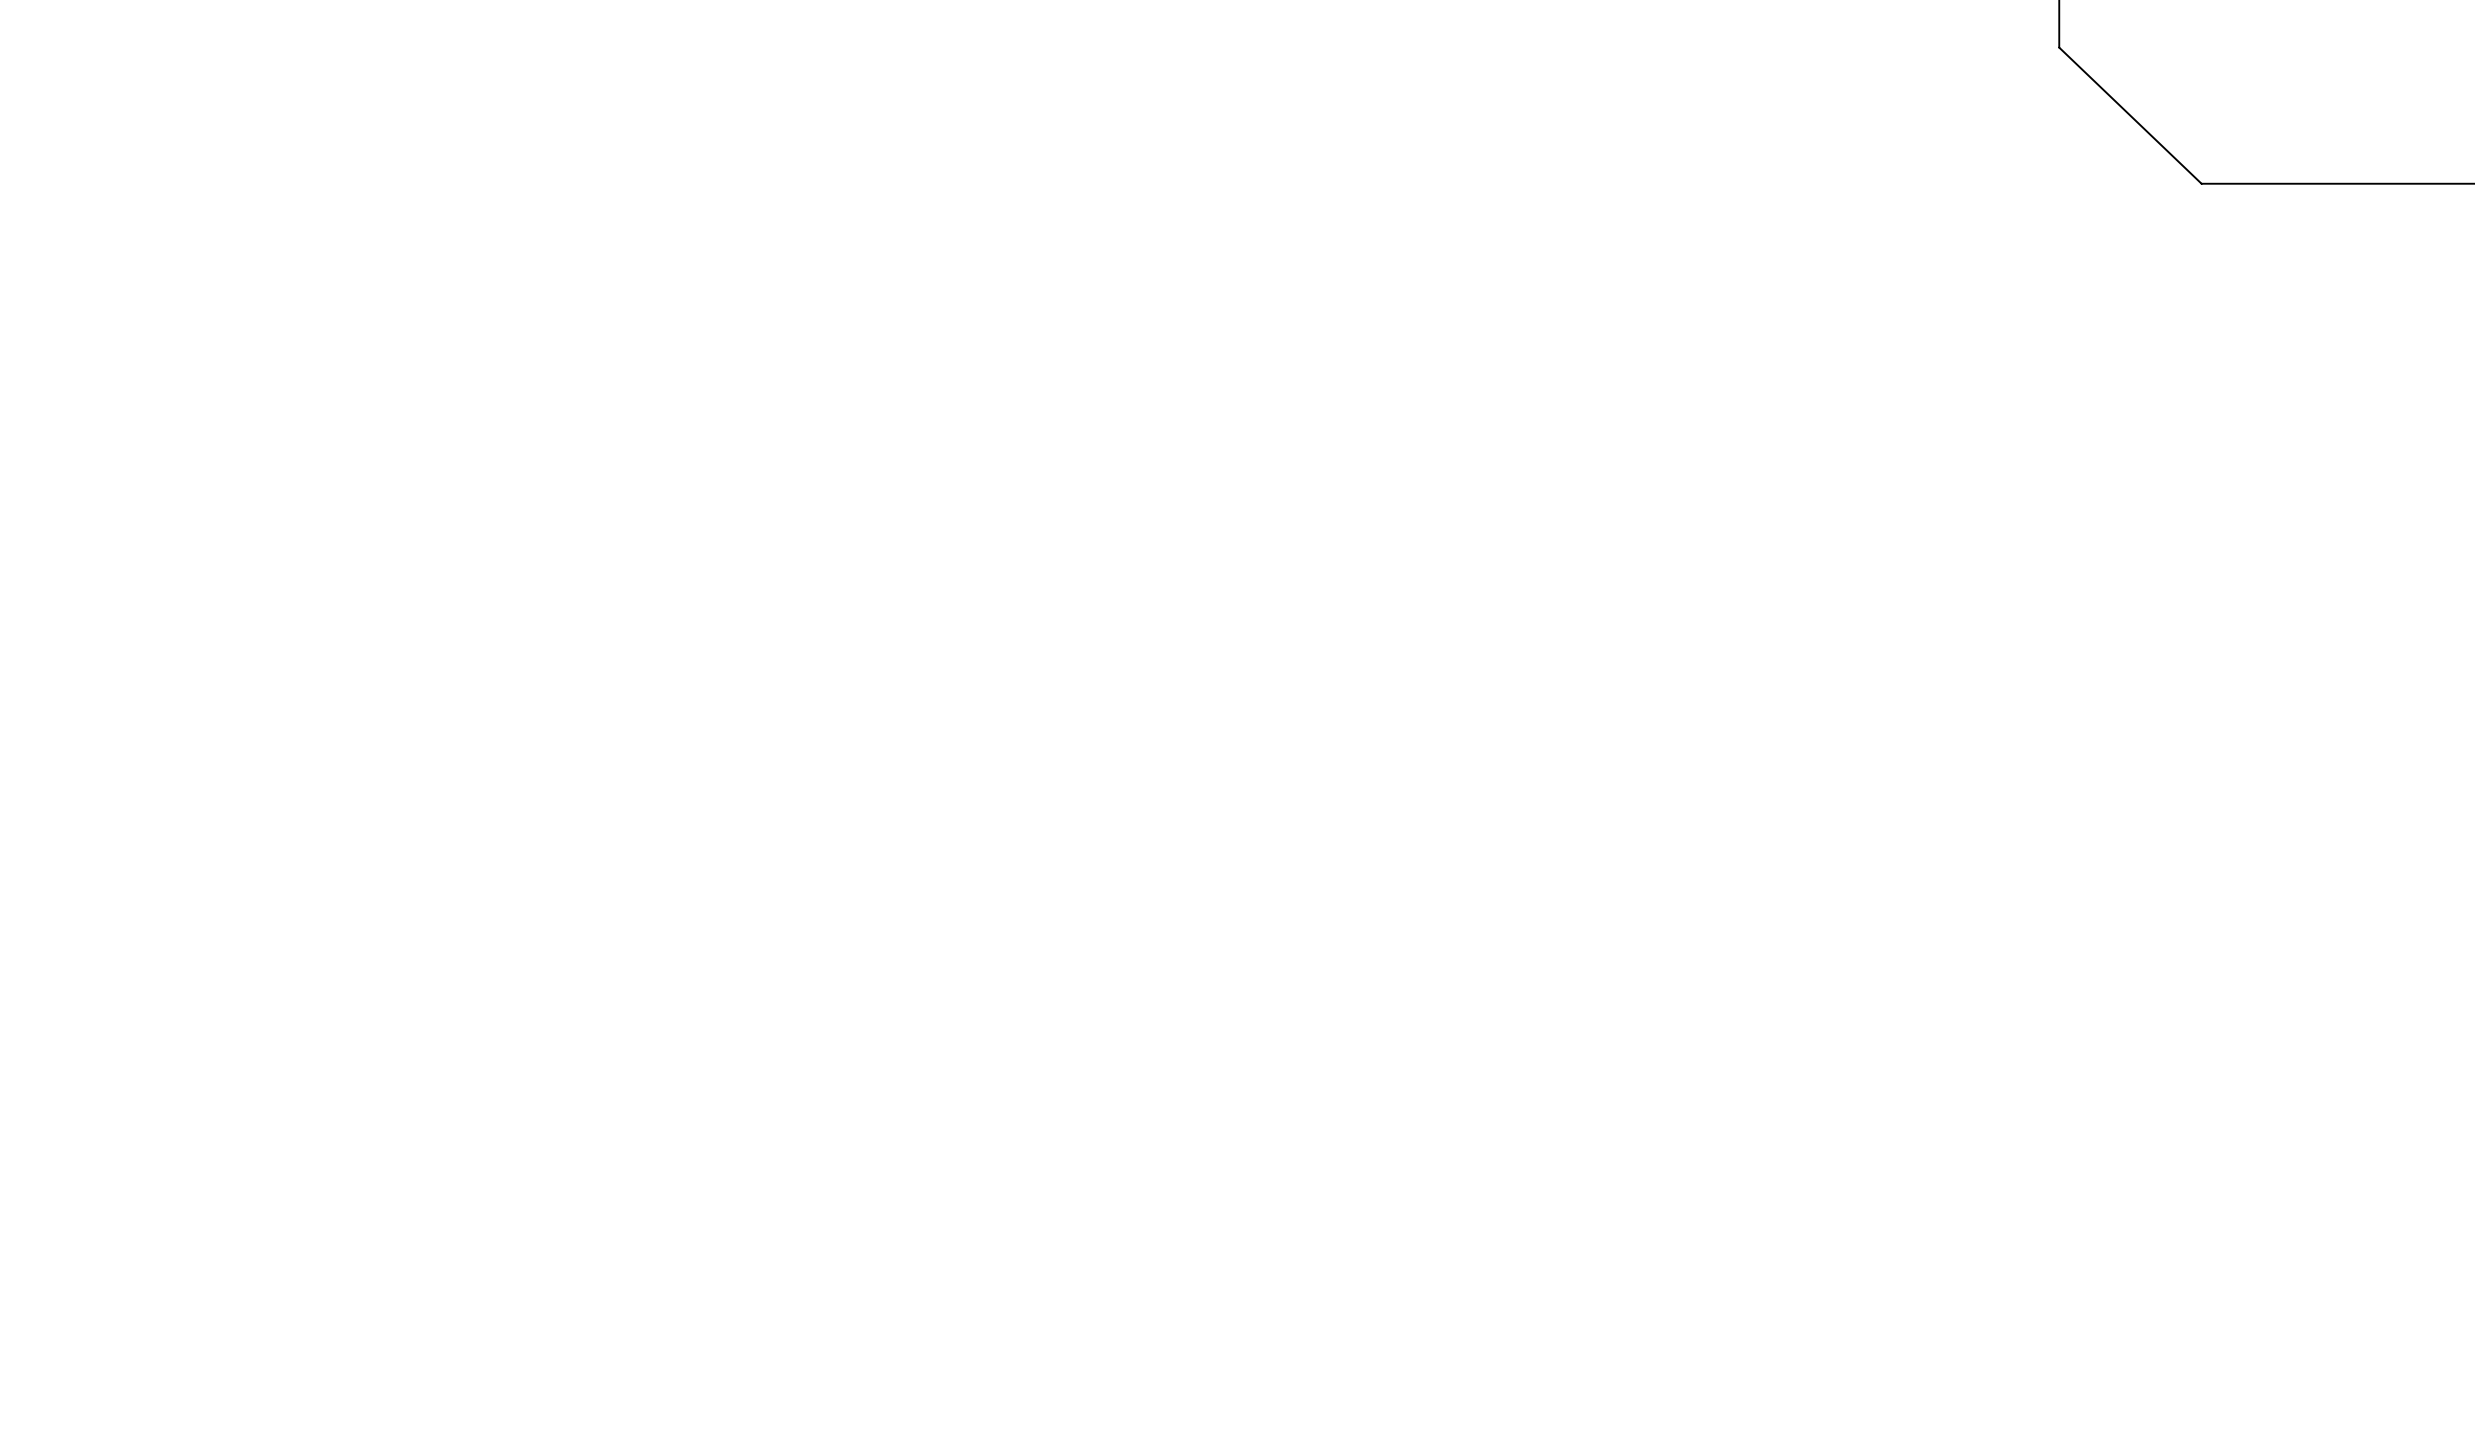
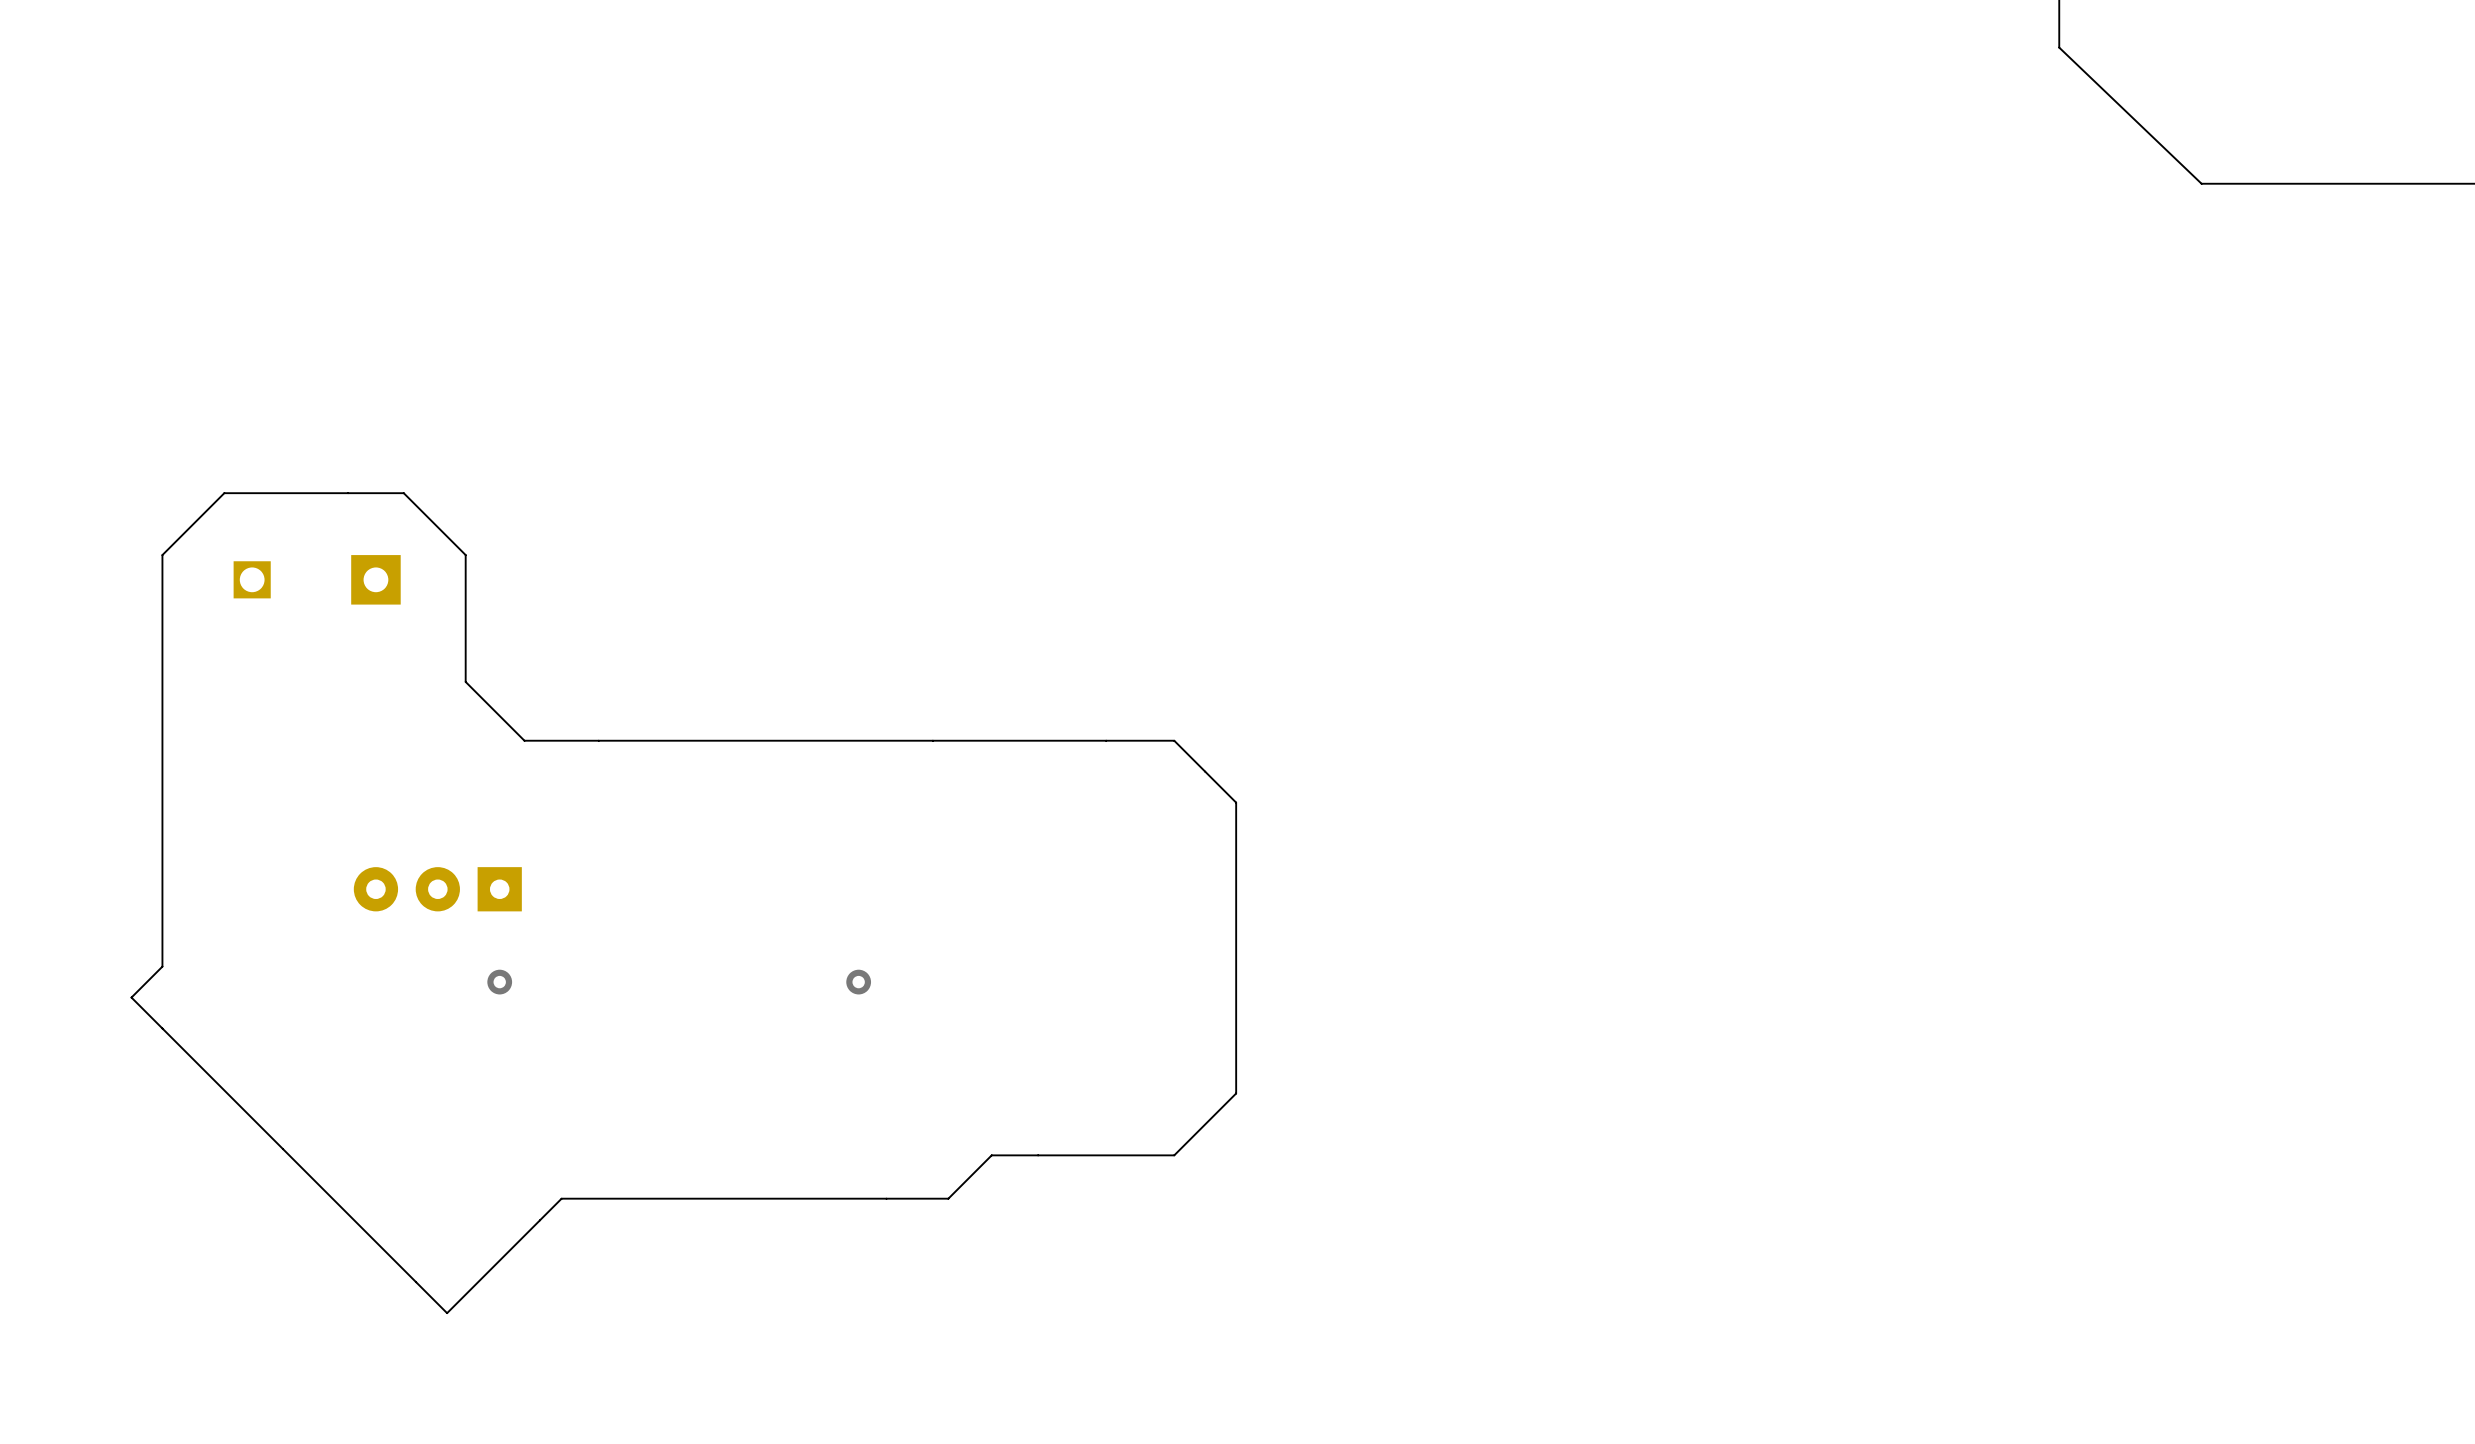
board edge: none -> (403, 493) (465, 555) (465, 681) (524, 740) (1174, 740) (1236, 802) (1236, 1093) (1174, 1155) (991, 1155) (948, 1198) (561, 1198) (447, 1313) (131, 997) (162, 966) (162, 555) (224, 493) (403, 493)
part: none -> (252, 579)
part: none -> (375, 579)
part: none -> (437, 889)
via: none -> (499, 982)
via: none -> (858, 982)

